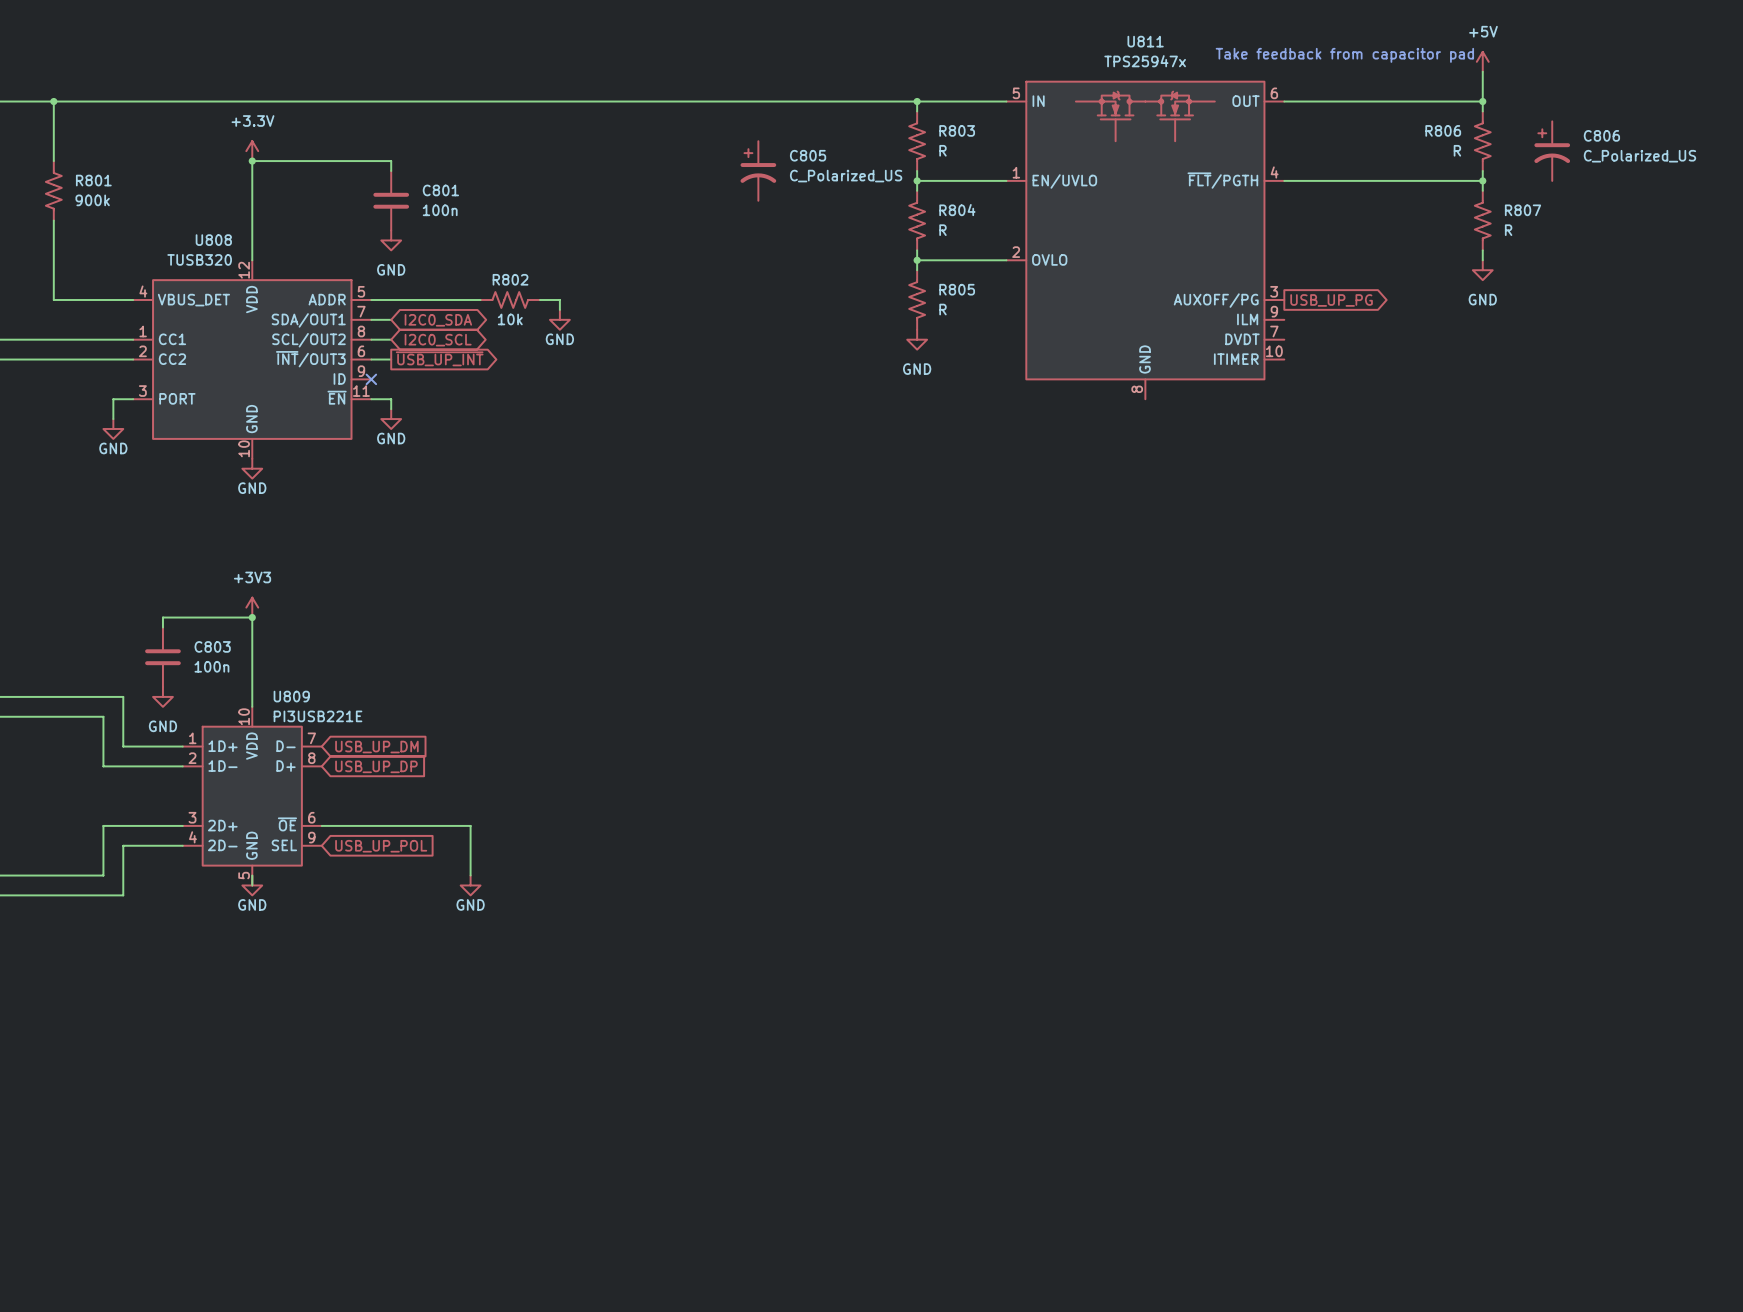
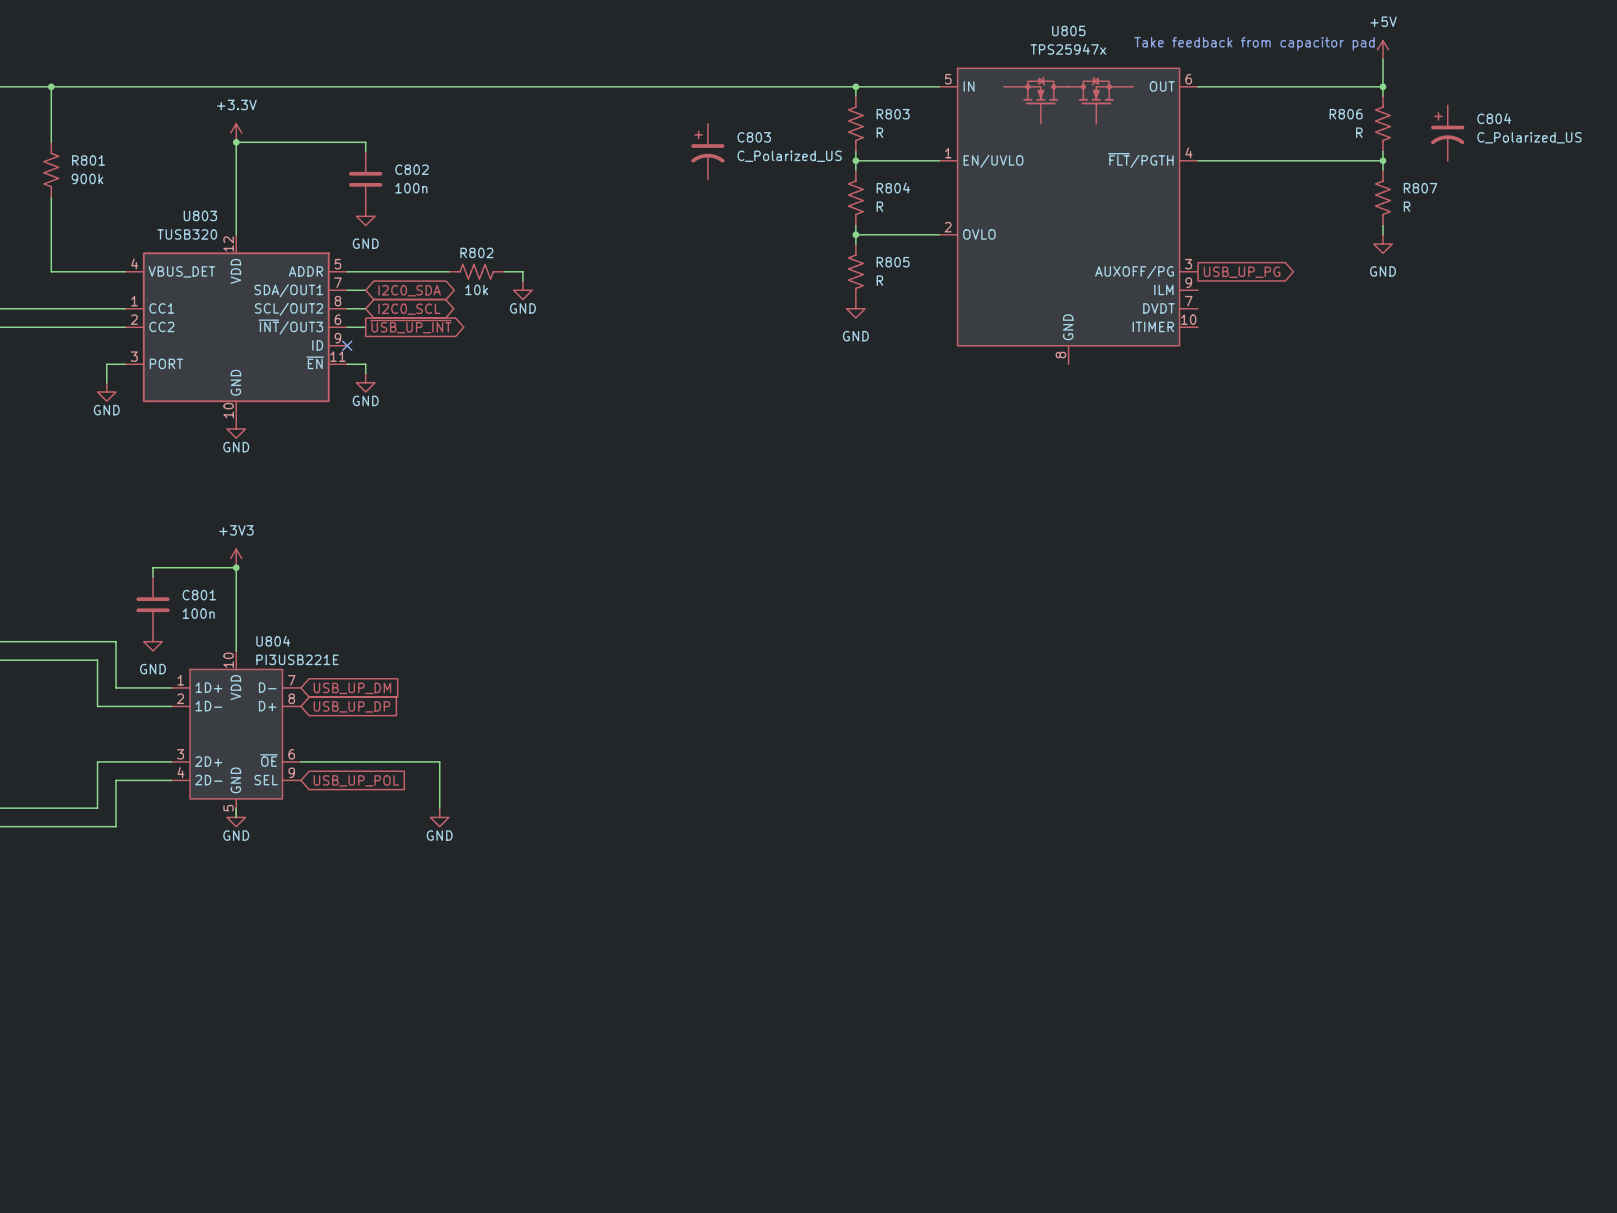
U811 name: U811 (1145, 41) -> U805 (1068, 30)
C806 name: C806 (1601, 135) -> C804 (1494, 118)
C805 name: C805 (808, 155) -> C803 (754, 137)
C801 name: C801 (440, 190) -> C802 (412, 169)
U808 name: U808 (213, 240) -> U803 (200, 215)
C803 name: C803 (212, 646) -> C801 (199, 595)
U809 name: U809 (291, 696) -> U804 (273, 641)

